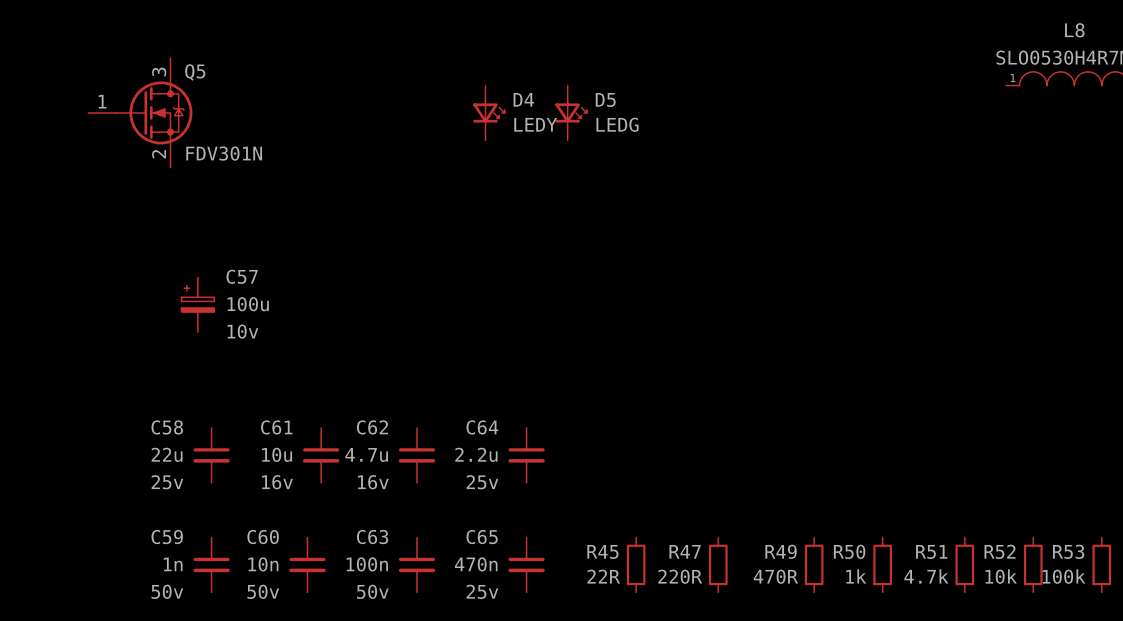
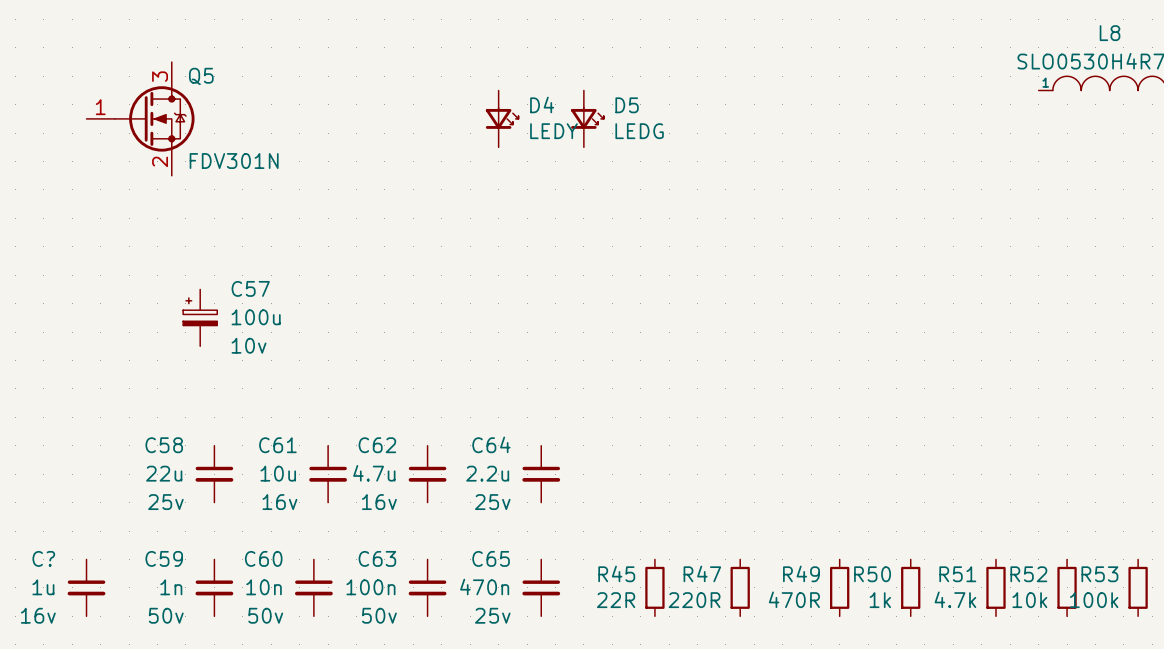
C?: none -> 1u (86, 587)

